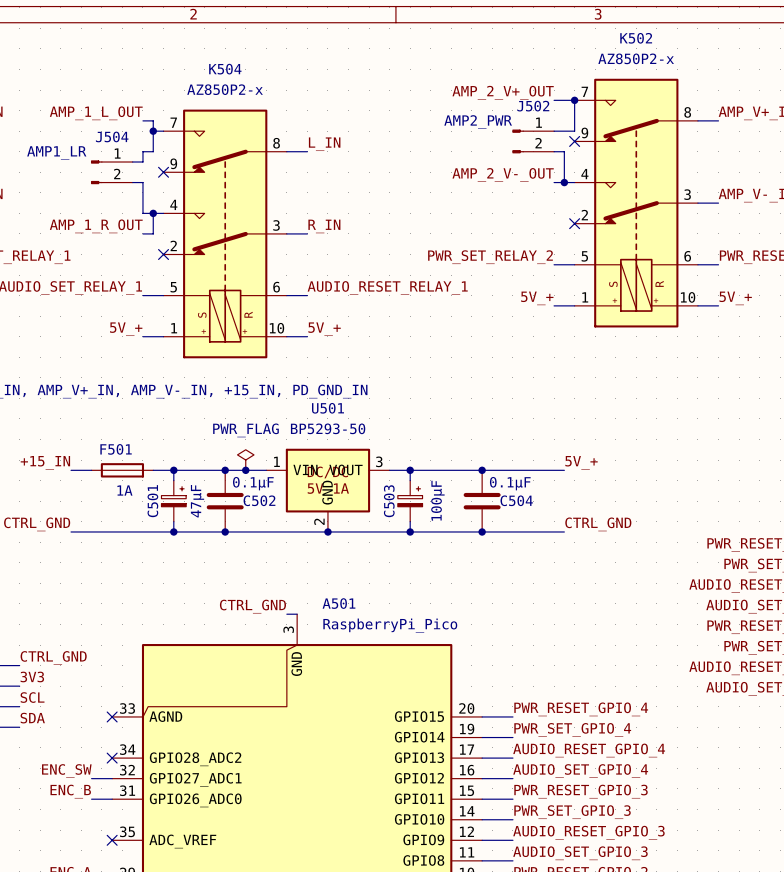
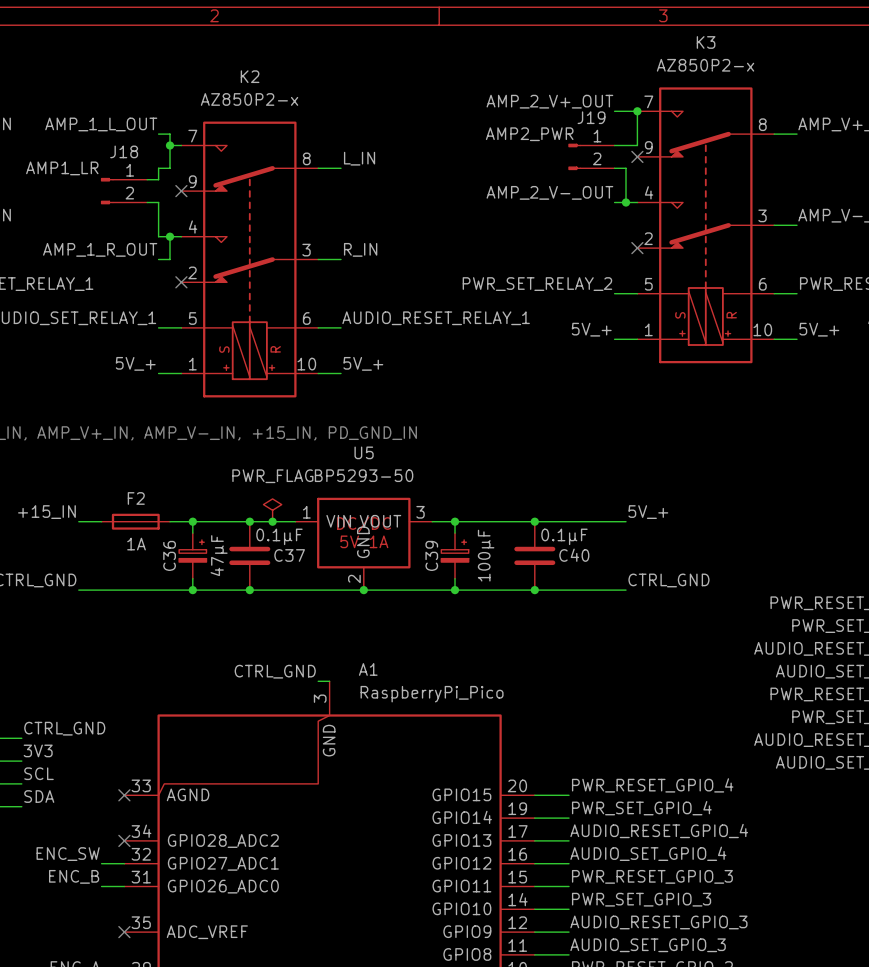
K502 name: K502 (636, 38) -> K3 (706, 42)
K504 name: K504 (225, 69) -> K2 (250, 76)
J502 name: J502 (533, 106) -> J19 (591, 117)
J504 name: J504 (112, 136) -> J18 (124, 151)
U501 name: U501 (328, 408) -> U5 (364, 452)
F501 name: F501 (116, 449) -> F2 (136, 498)
C502 name: C502 (259, 500) -> C37 (289, 555)
C504 name: C504 (516, 500) -> C40 (574, 555)
C501 name: C501 (152, 501) -> C36 (169, 555)
C503 name: C503 (389, 501) -> C39 (431, 555)
A501 name: A501 (339, 603) -> A1 (368, 669)

